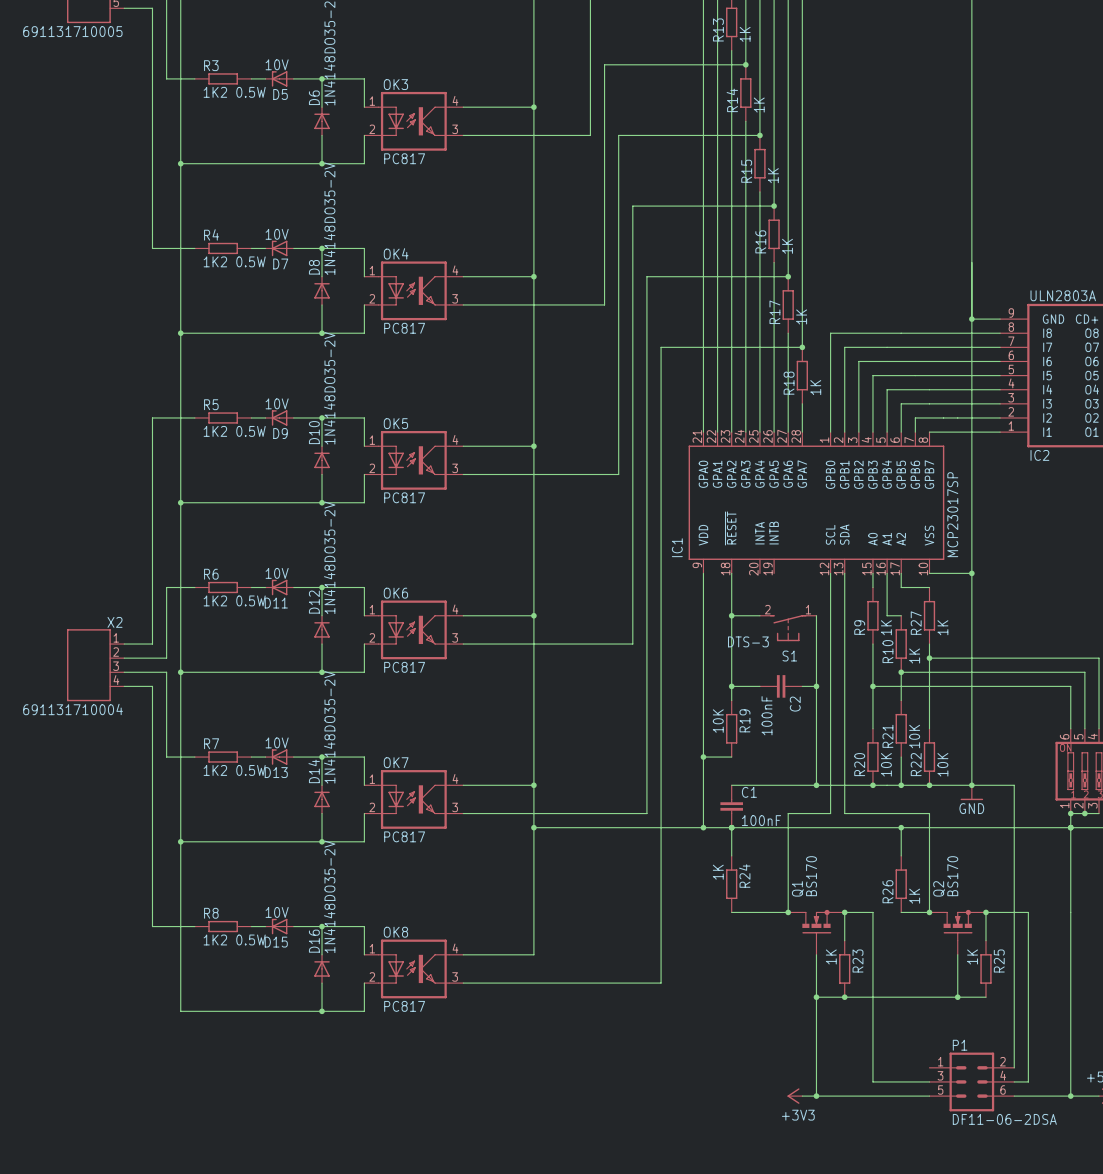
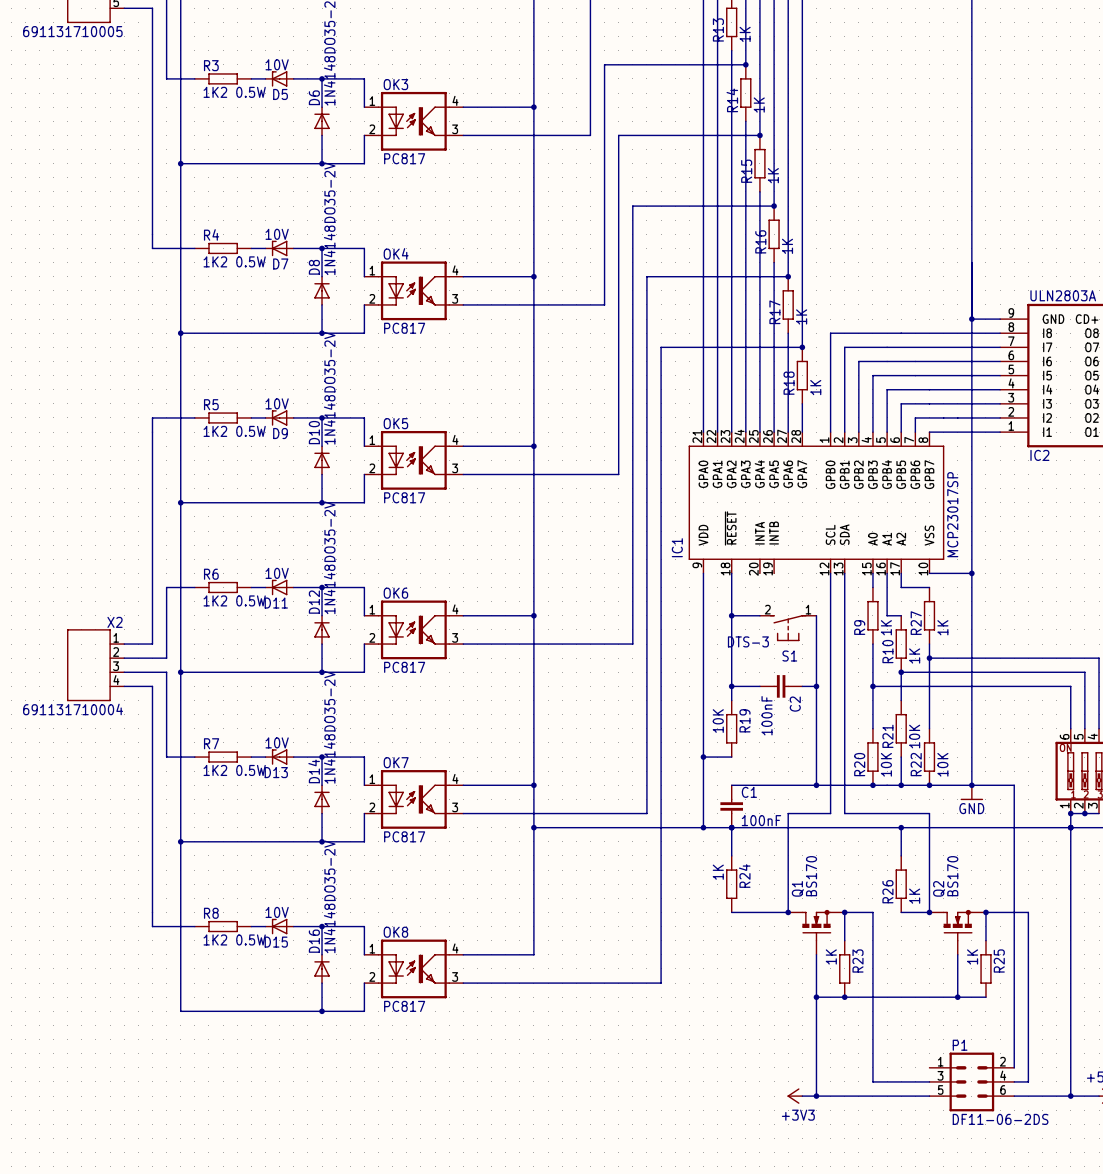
P1 value: DF11-06-2DSA (1004, 1119) -> DF11-06-2DS (1000, 1119)

